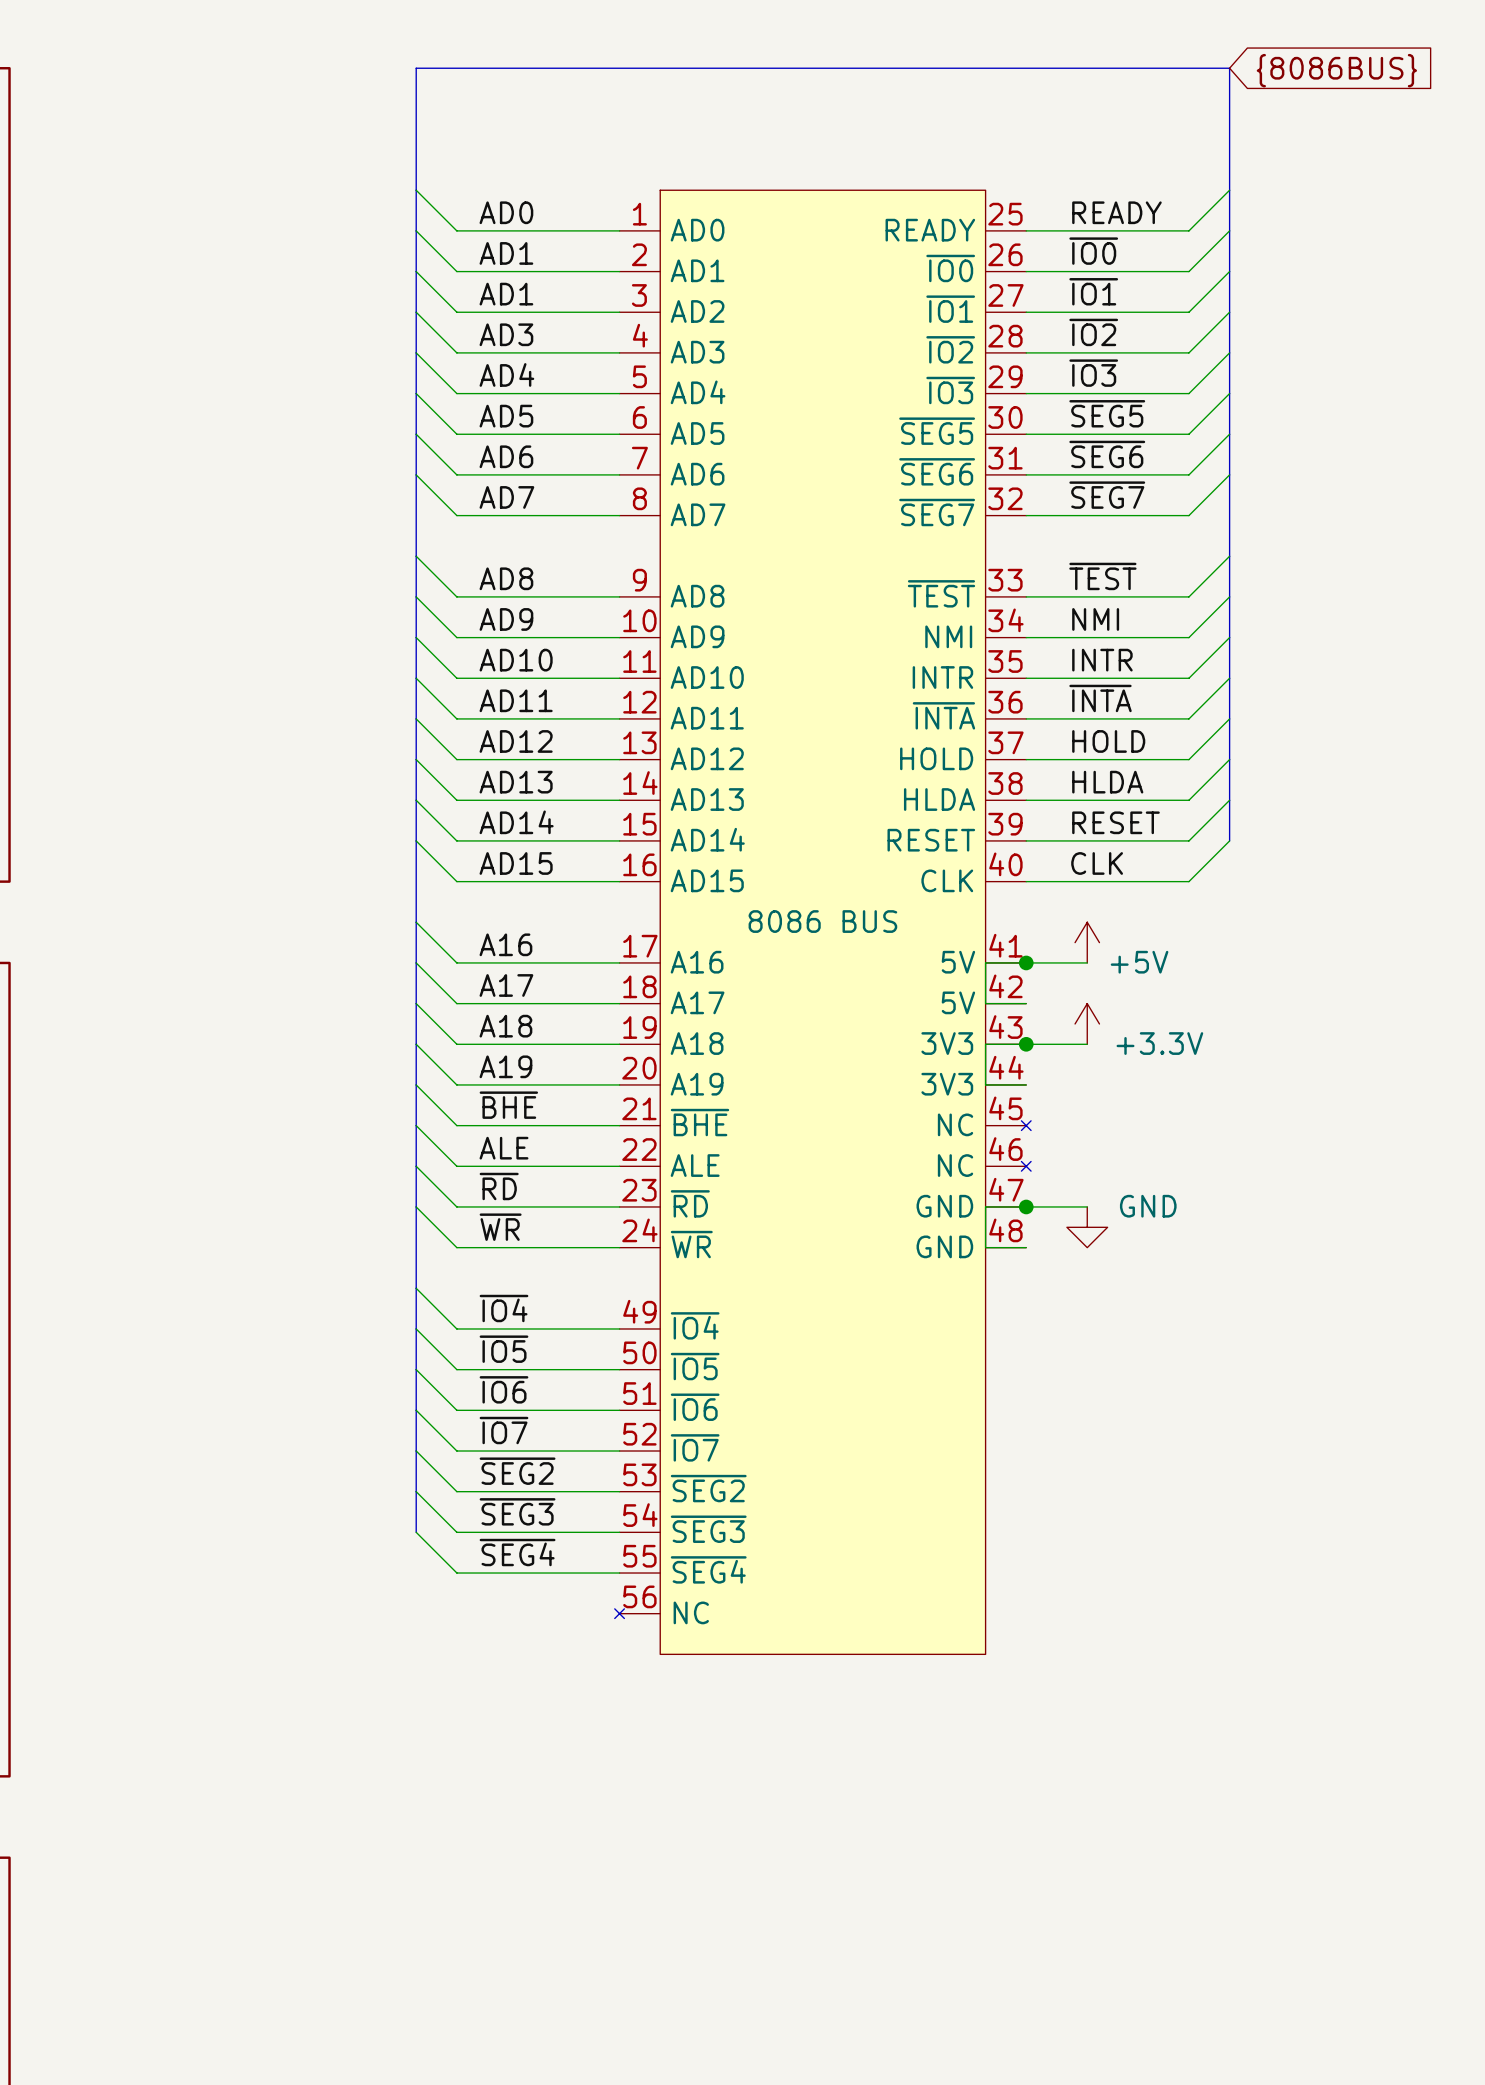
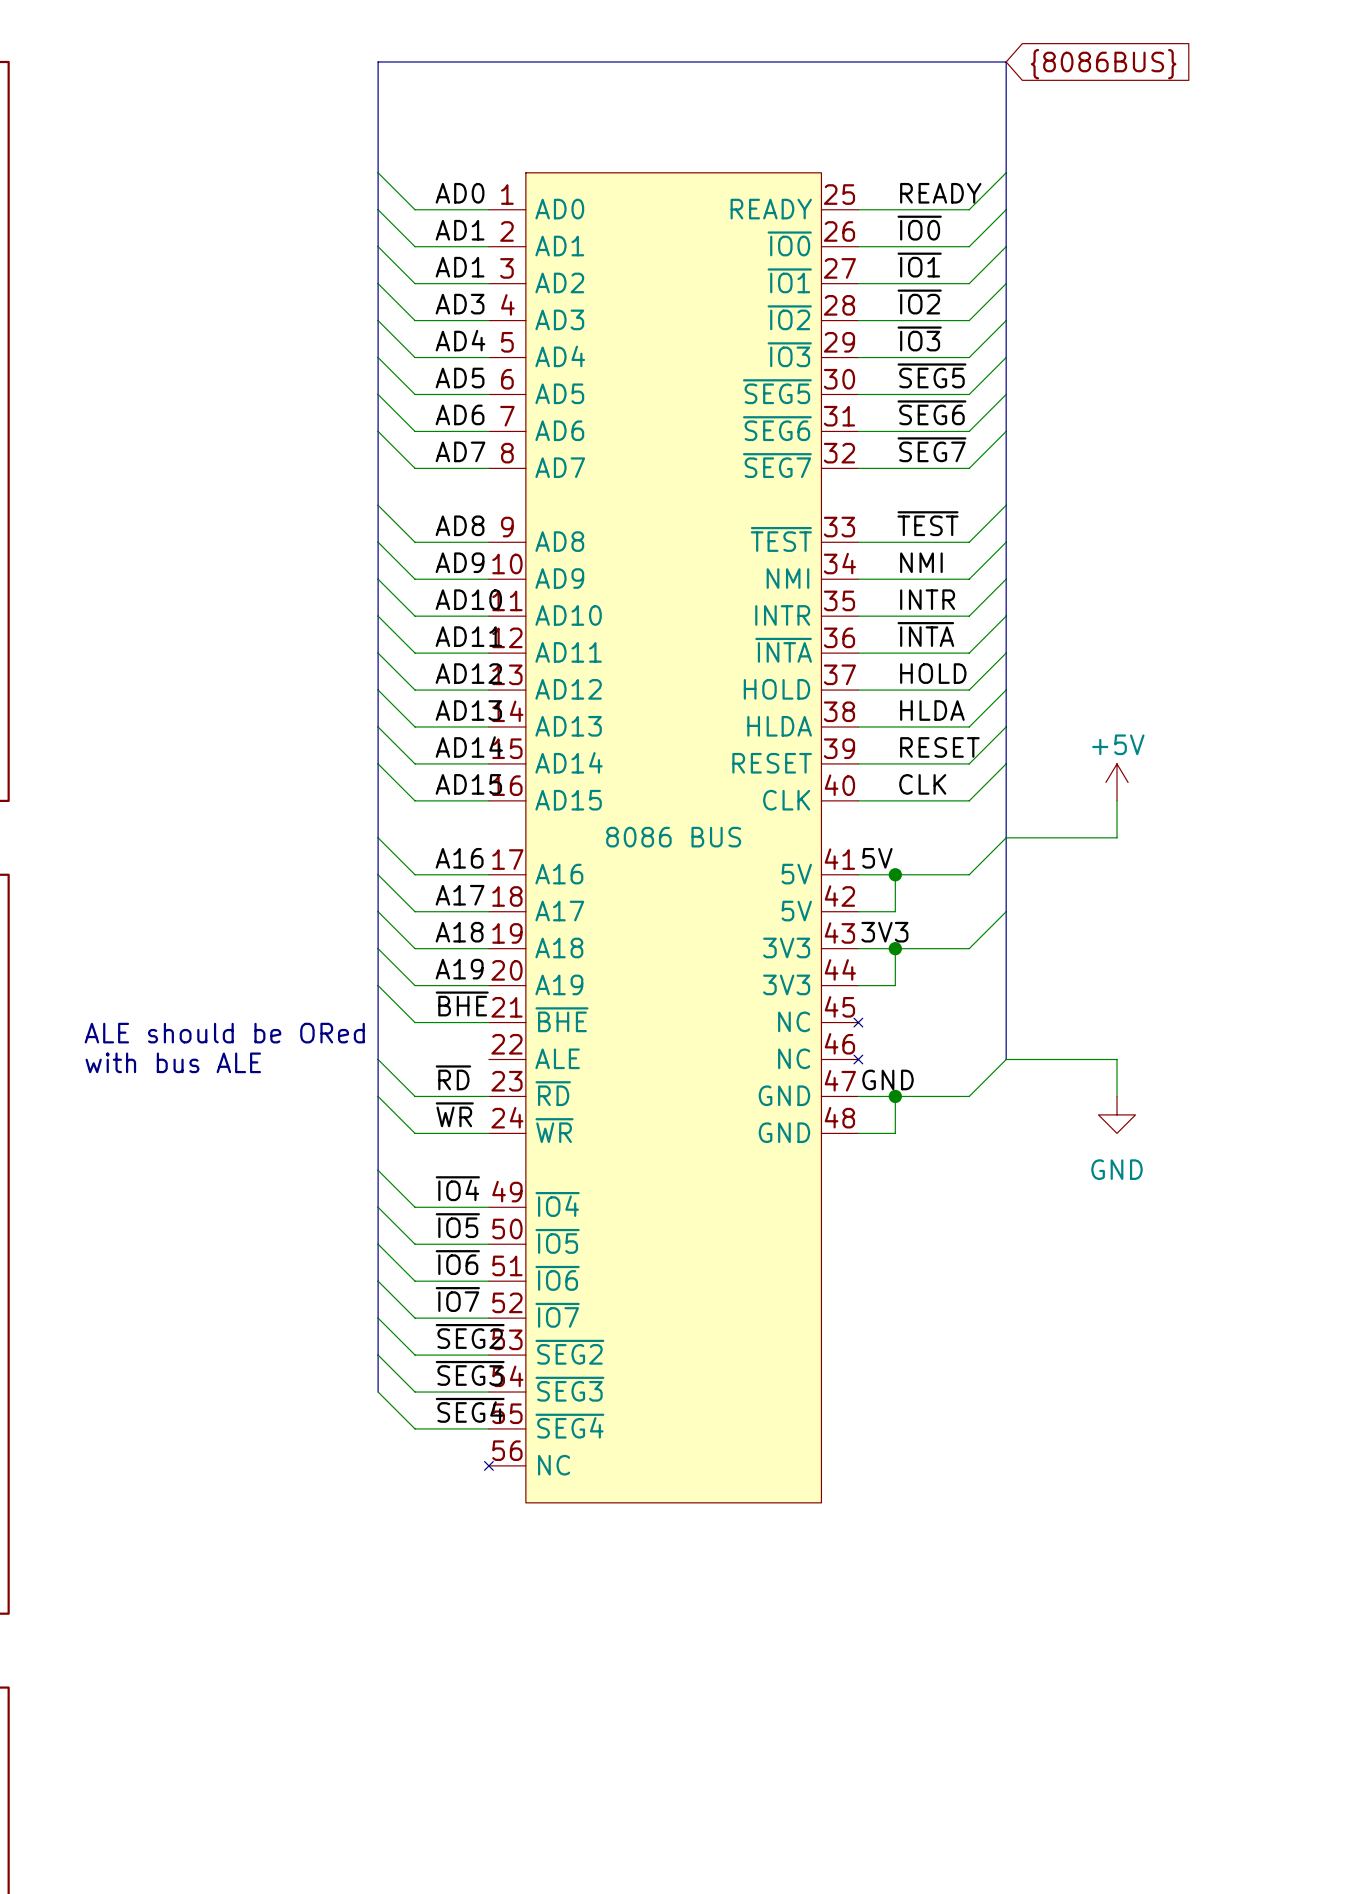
bus: (1107, 68) (1229, 68) (1229, 840) -> (1006, 61) (1006, 1059)
global label position: {8086BUS} (1336, 70) -> {8086BUS} (1103, 64)
wire: (1229, 190) (1188, 230) (1066, 230) -> (1006, 172) (969, 209)
label position: READY (1116, 212) -> READY (940, 193)
wire: (1229, 230) (1188, 271) (1066, 271) -> (1006, 209) (969, 246)
label position: ~{IO0} (1093, 251) -> ~{IO0} (919, 228)
wire: (1229, 271) (1188, 312) (1066, 312) -> (1006, 246) (969, 283)
label position: ~{IO1} (1093, 291) -> ~{IO1} (919, 265)
wire: (1229, 312) (1188, 352) (1066, 352) -> (1006, 283) (969, 320)
label position: ~{IO2} (1093, 332) -> ~{IO2} (919, 301)
wire: (1229, 352) (1188, 393) (1066, 393) -> (1006, 320) (969, 357)
label position: ~{IO3} (1093, 373) -> ~{IO3} (919, 338)
wire: (1229, 393) (1188, 434) (1066, 434) -> (1006, 357) (969, 394)
label position: ~{SEG5} (1107, 413) -> ~{SEG5} (931, 375)
wire: (1229, 434) (1188, 474) (1066, 474) -> (1006, 394) (969, 431)
label position: ~{SEG6} (1107, 454) -> ~{SEG6} (931, 412)
wire: (1229, 474) (1188, 515) (1066, 515) -> (1006, 431) (969, 468)
label position: ~{SEG7} (1107, 495) -> ~{SEG7} (931, 449)
wire: (1229, 556) (1188, 596) (1066, 596) -> (1006, 505) (969, 542)
label position: ~{TEST} (1102, 576) -> ~{TEST} (928, 523)
wire: (1229, 596) (1188, 637) (1066, 637) -> (1006, 542) (969, 579)
label position: NMI (1095, 619) -> NMI (921, 562)
wire: (1229, 637) (1188, 678) (1066, 678) -> (1006, 579) (969, 616)
label position: INTR (1102, 660) -> INTR (927, 599)
wire: (1229, 678) (1188, 718) (1066, 718) -> (1006, 616) (969, 653)
label position: ~{INTA} (1100, 698) -> ~{INTA} (925, 634)
wire: (1229, 718) (1188, 759) (1066, 759) -> (1006, 653) (969, 690)
label position: HOLD (1108, 741) -> HOLD (933, 673)
wire: (1229, 759) (1188, 800) (1066, 800) -> (1006, 690) (969, 727)
label position: HLDA (1107, 782) -> HLDA (932, 710)
wire: (1229, 800) (1188, 840) (1066, 840) -> (1006, 727) (969, 763)
label position: RESET (1115, 822) -> RESET (939, 747)
wire: (1229, 840) (1188, 881) (1066, 881) -> (1006, 763) (969, 800)
label position: CLK (1097, 863) -> CLK (922, 784)
part position: (822, 922) -> (673, 837)
power symbol position: +5V (1087, 942) -> +5V (1117, 782)
label: none -> 5V (877, 858)
junction position: (1026, 962) -> (895, 874)
wire: (1066, 962) (1087, 962) -> (969, 874) (1006, 837) (1117, 837) (1117, 800)
power symbol text position: +5V (1139, 962) -> +5V (1118, 744)
power symbol: +3.3V (1087, 1023) -> none
label: none -> 3V3 (884, 932)
junction position: (1026, 1044) -> (895, 948)
wire: (1066, 1044) (1087, 1044) -> (969, 948) (1006, 911)
wire: (416, 1125) (456, 1166) (619, 1166) -> none
text: none -> ALE should be ORed (224, 1033)
label: ALE (504, 1148) -> none
text: none -> with bus ALE (173, 1062)
label: none -> GND (887, 1079)
junction position: (1026, 1206) -> (895, 1096)
wire: (1066, 1206) (1087, 1206) -> (969, 1096) (1006, 1059) (1117, 1059) (1117, 1096)
power symbol text position: GND (1148, 1206) -> GND (1117, 1169)
power symbol position: GND (1087, 1227) -> GND (1117, 1114)

